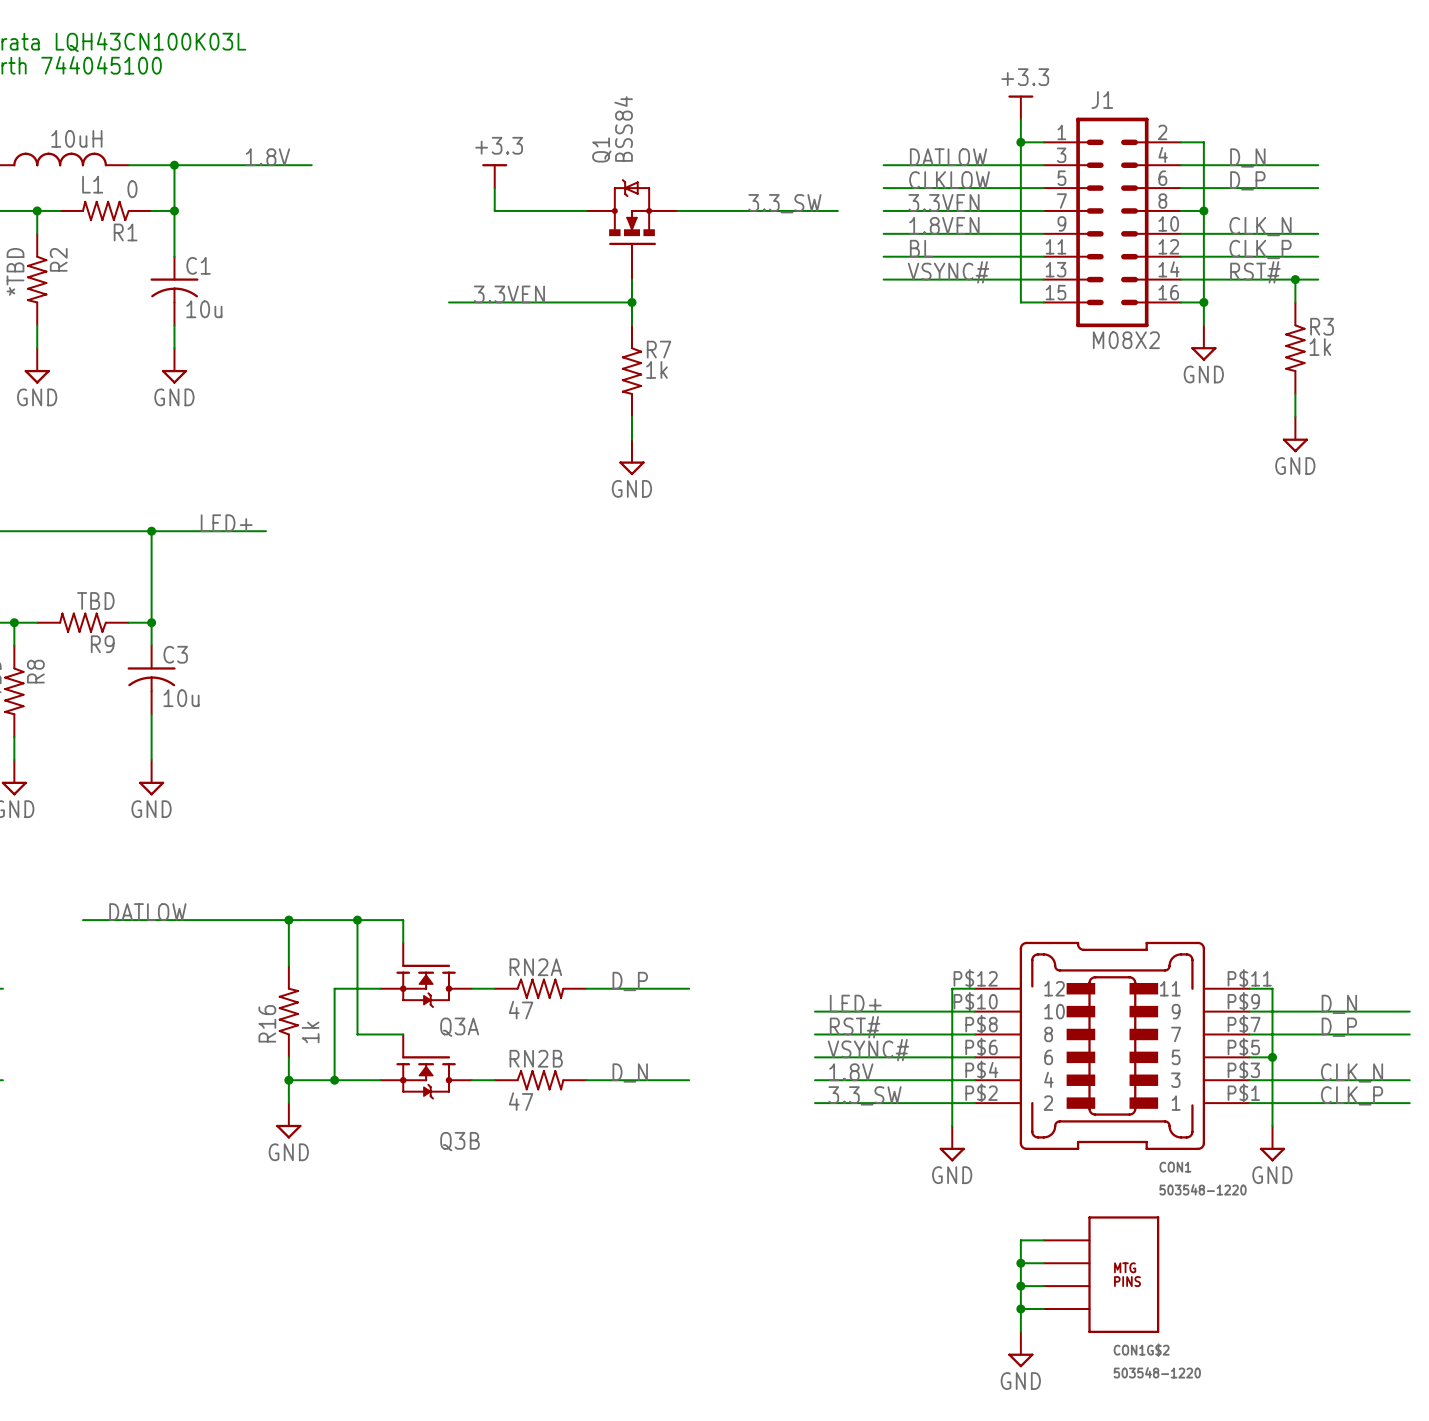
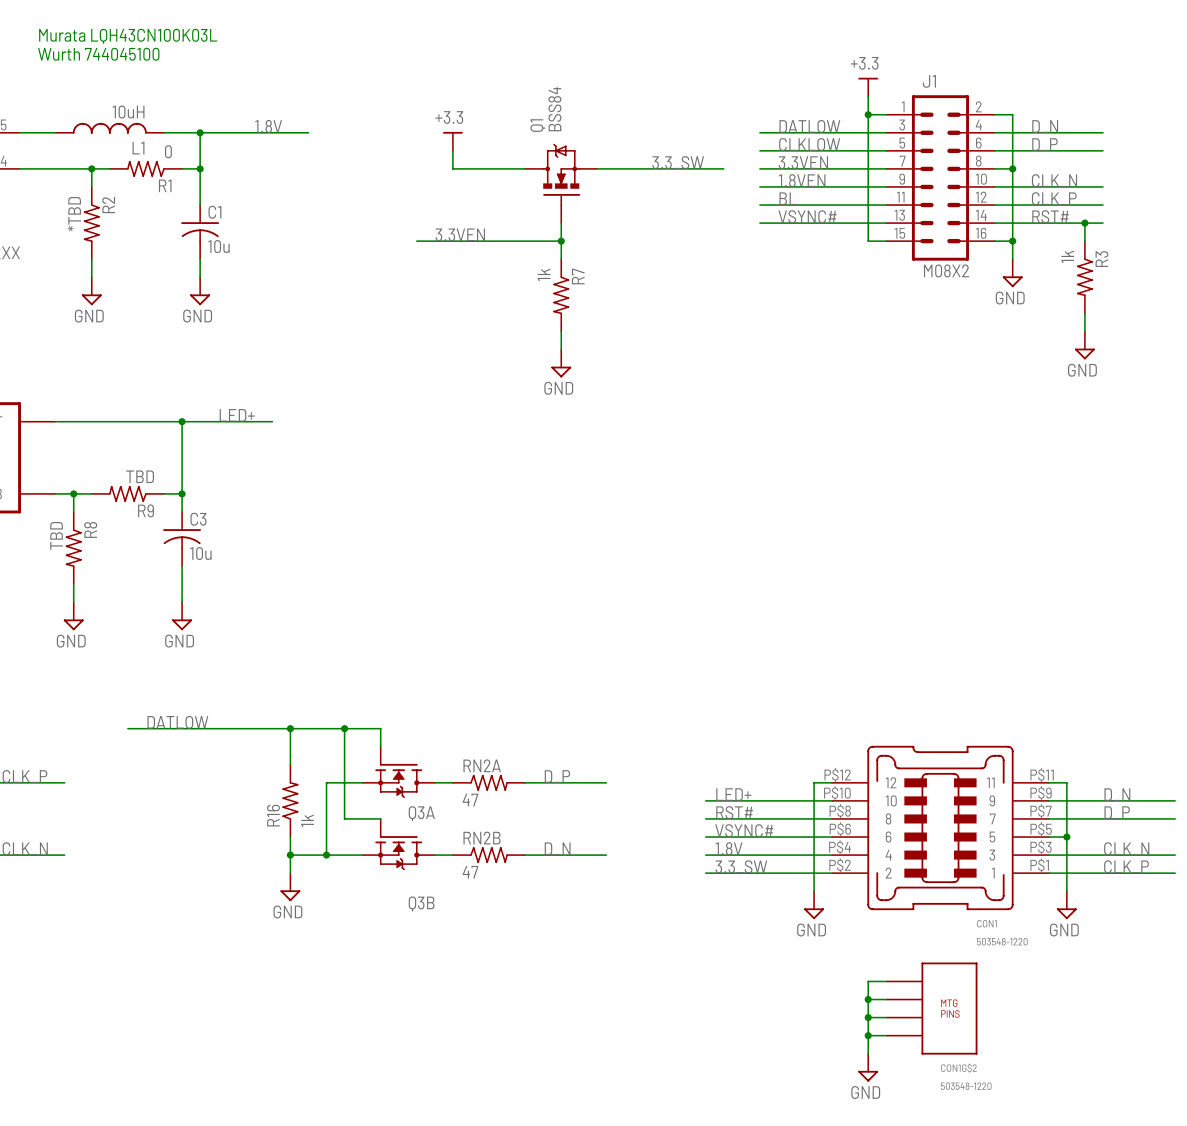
R3 name rotation: 0° (1322, 326) -> 90° counterclockwise (1101, 259)
R3 value rotation: 0° (1320, 347) -> 90° counterclockwise (1067, 256)
R3 value position: 1k (1320, 347) -> 1k (1067, 256)
R7 name rotation: 0° (659, 349) -> 90° counterclockwise (578, 276)
R7 value rotation: 0° (656, 369) -> 90° counterclockwise (544, 274)
R7 value position: 1k (656, 369) -> 1k (544, 274)

